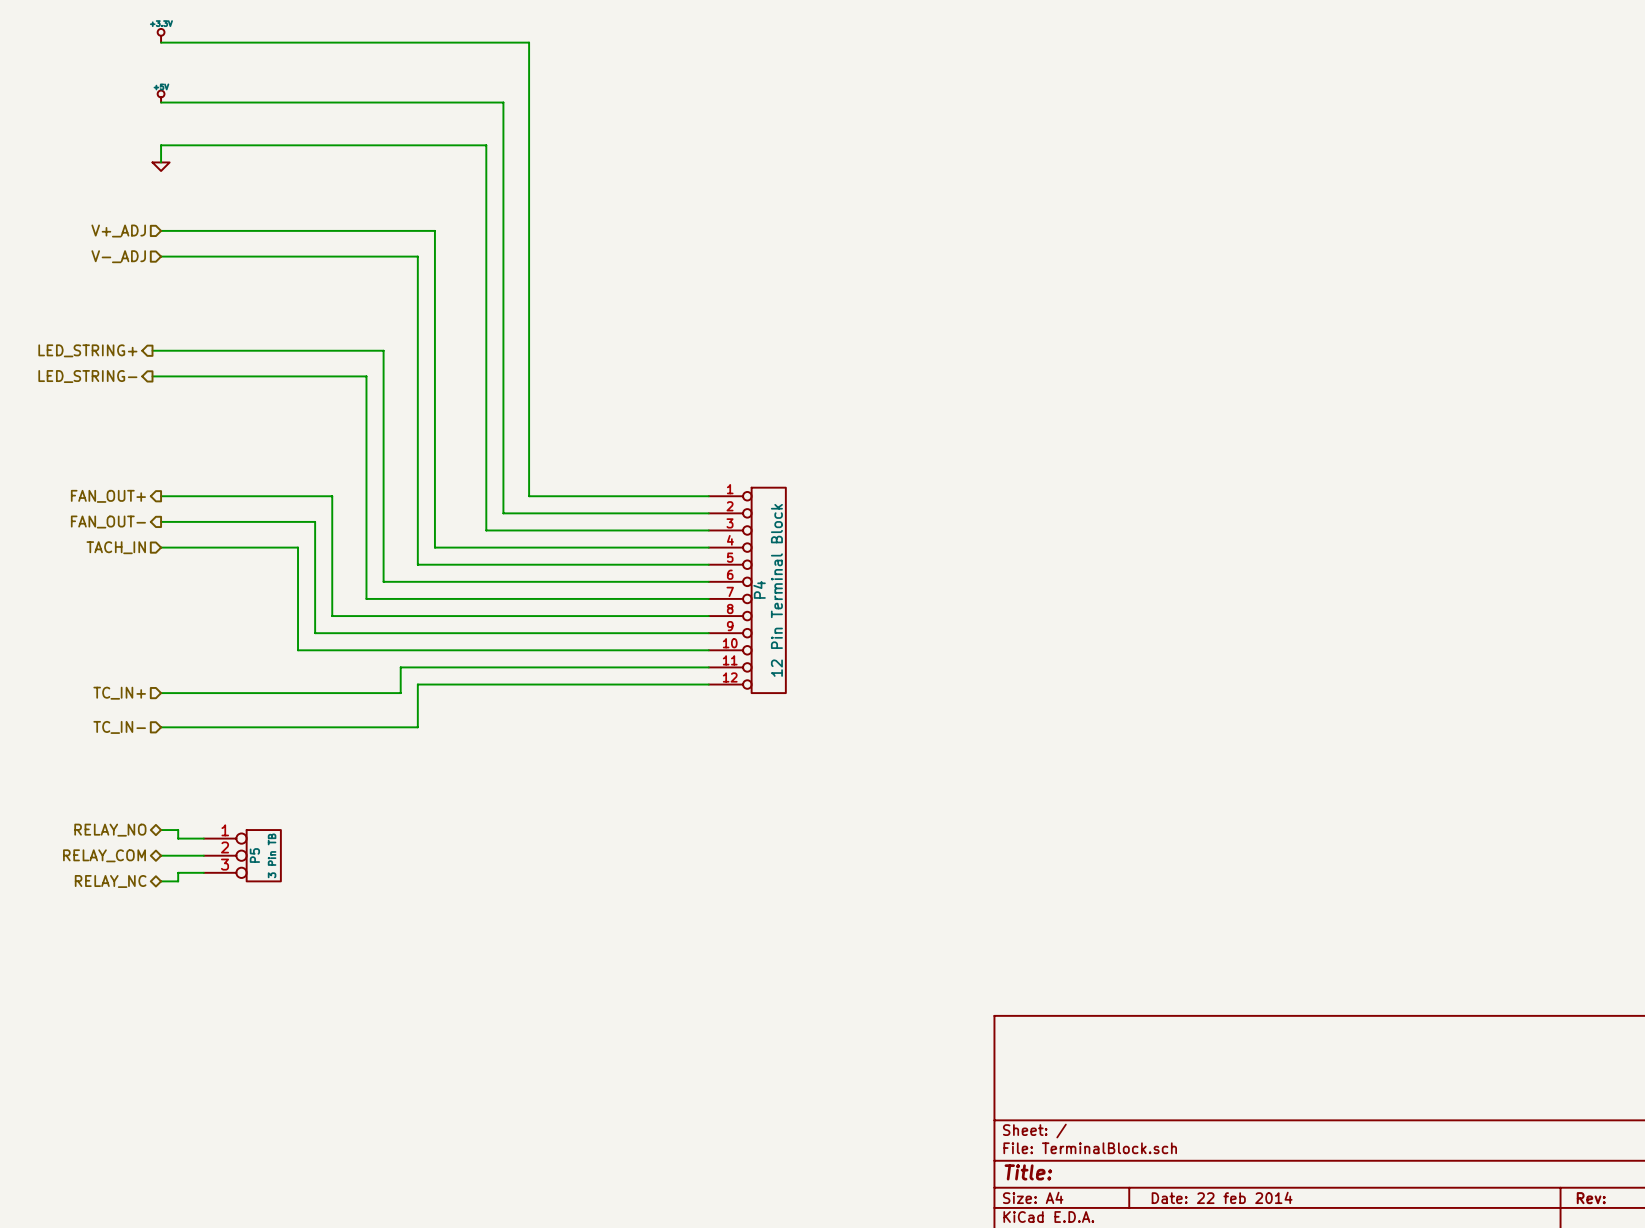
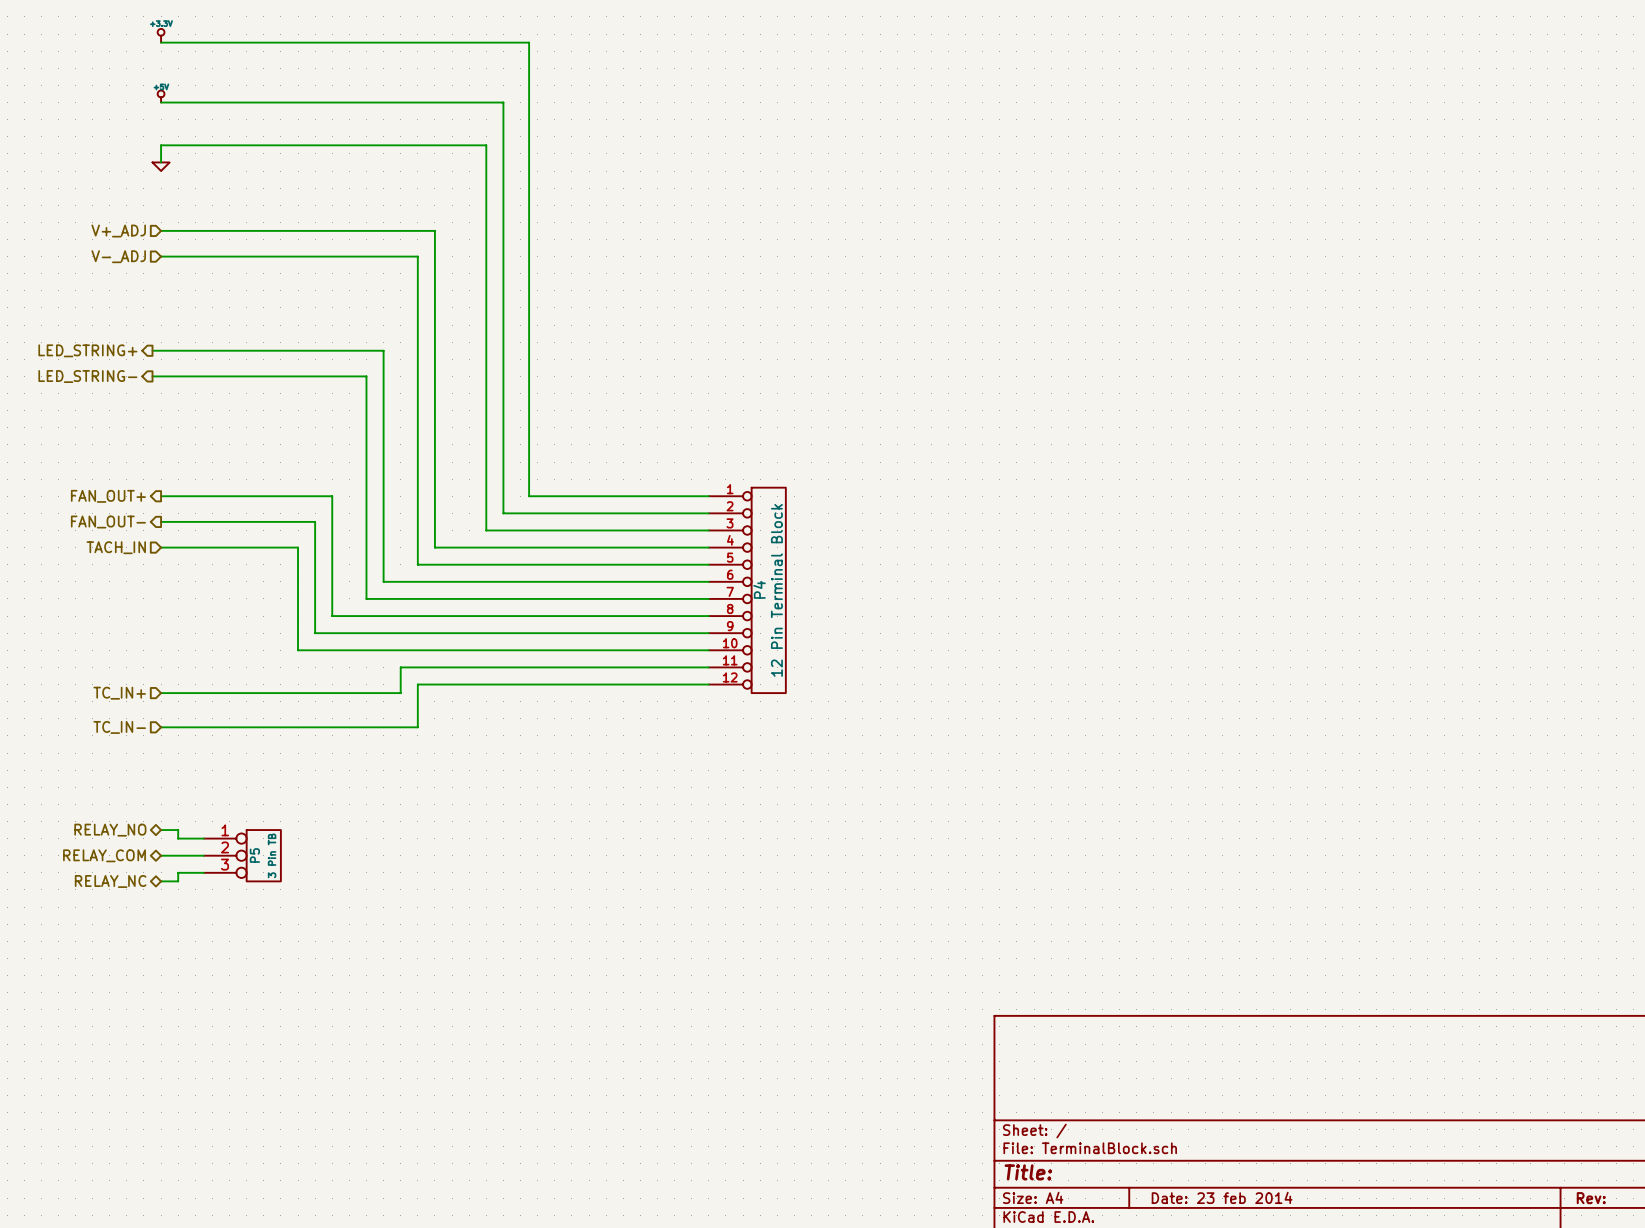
title block: Date: 22 feb 2014 (1222, 1197) -> Date: 23 feb 2014 (1222, 1197)

